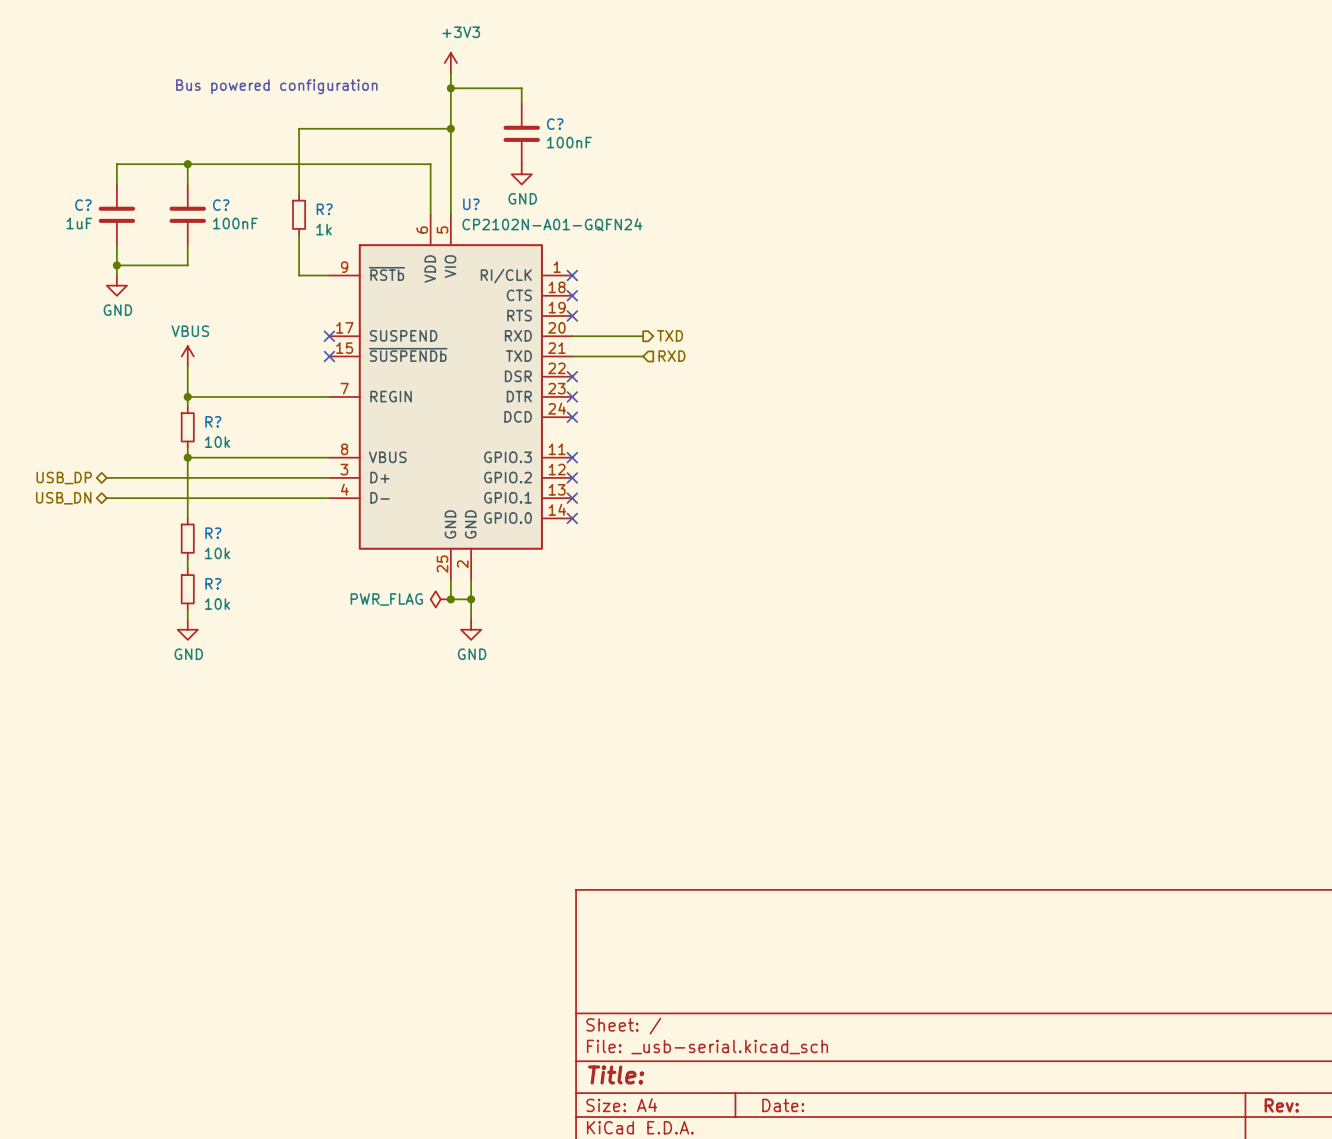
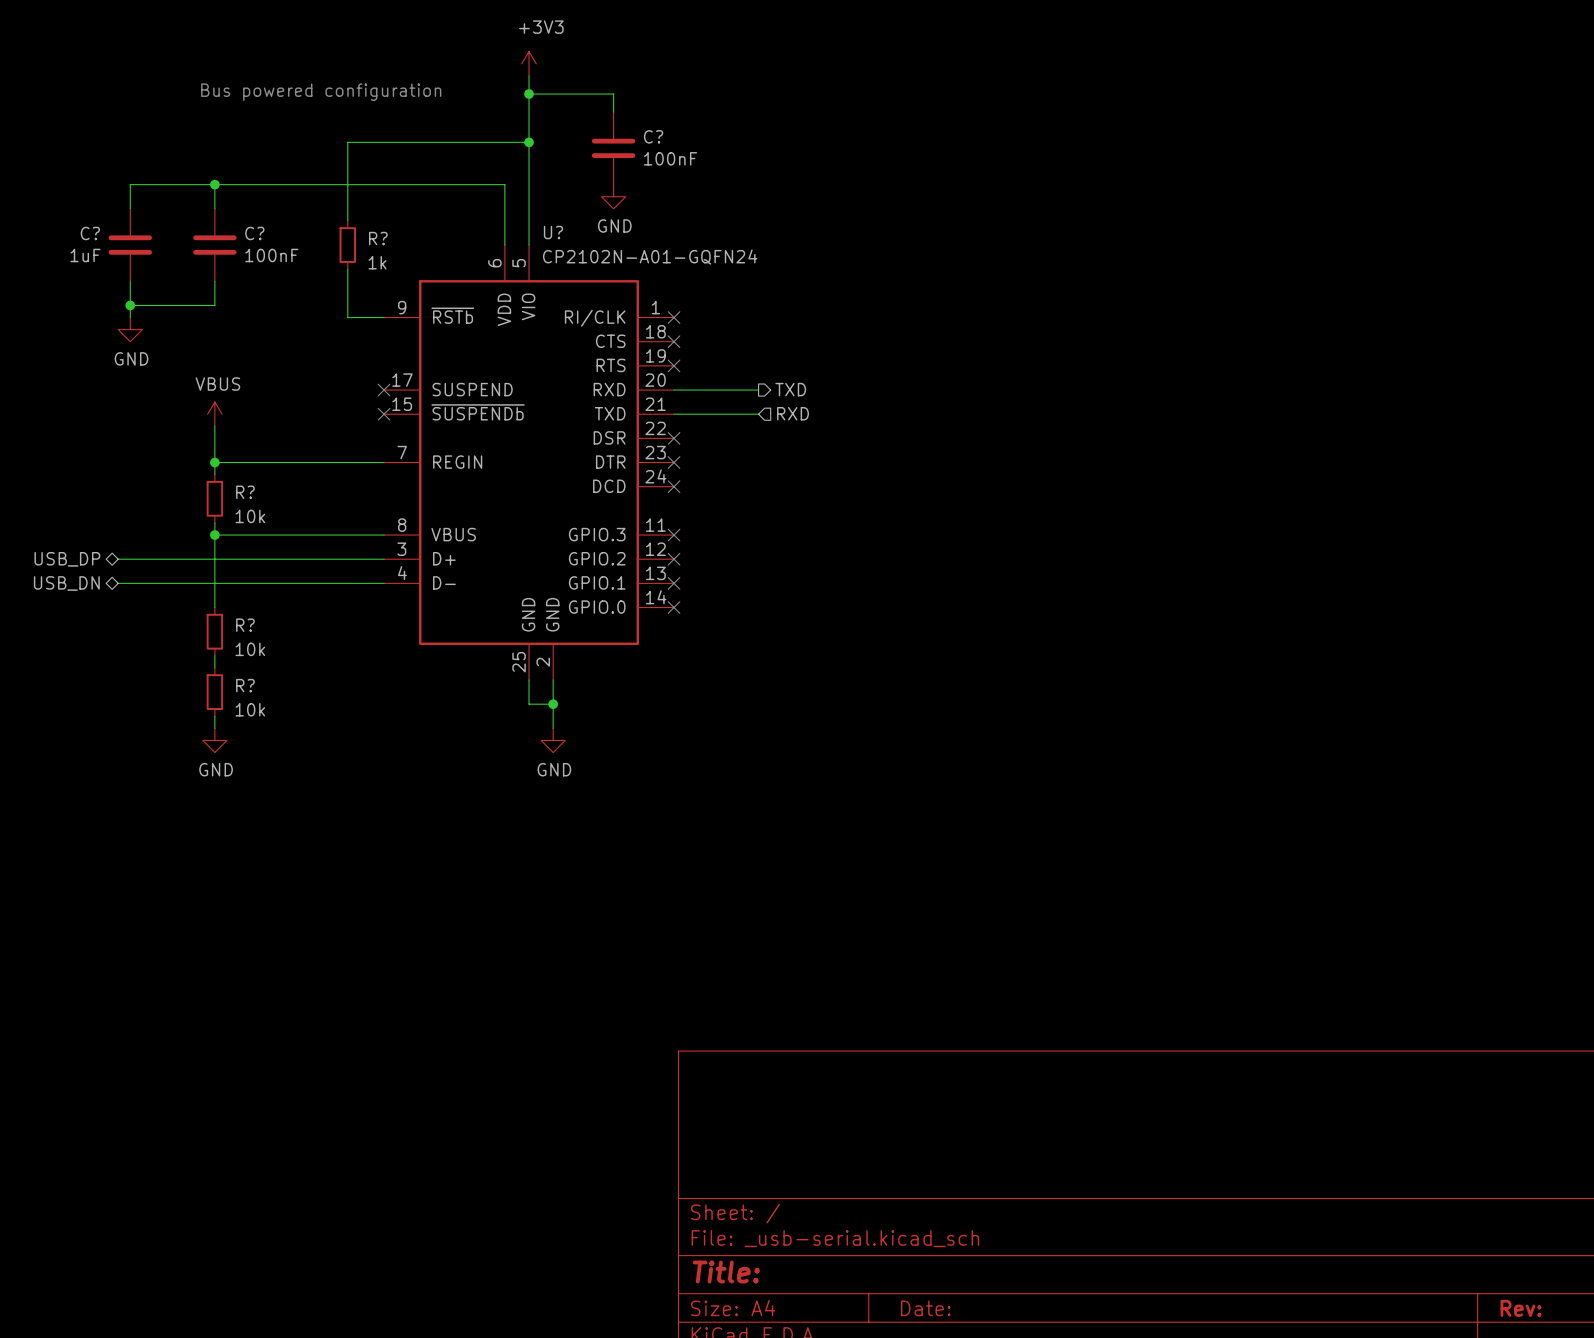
power symbol: PWR_FLAG (440, 599) -> none
junction: (450, 599) -> none

